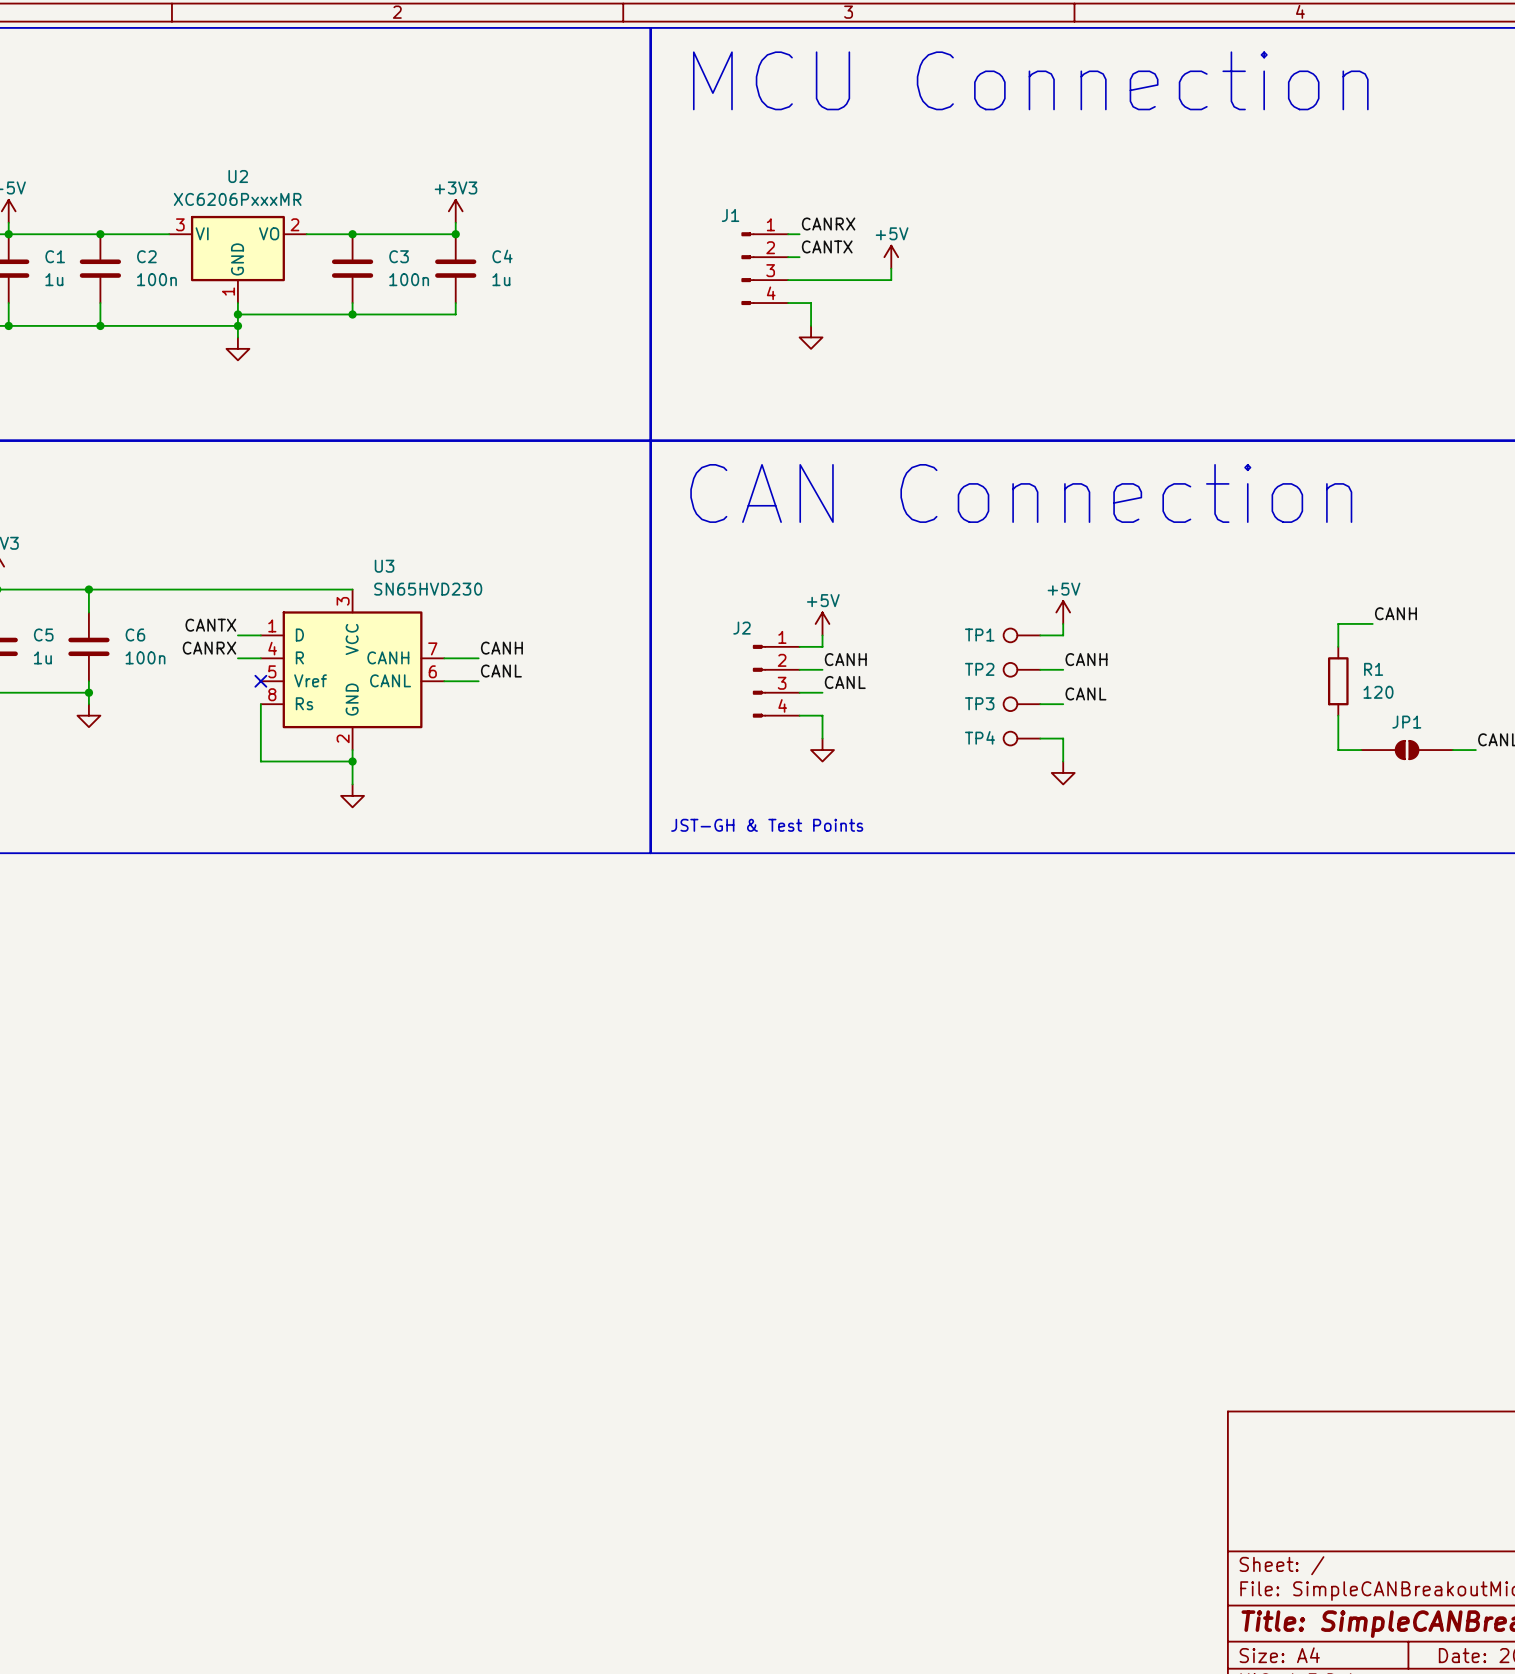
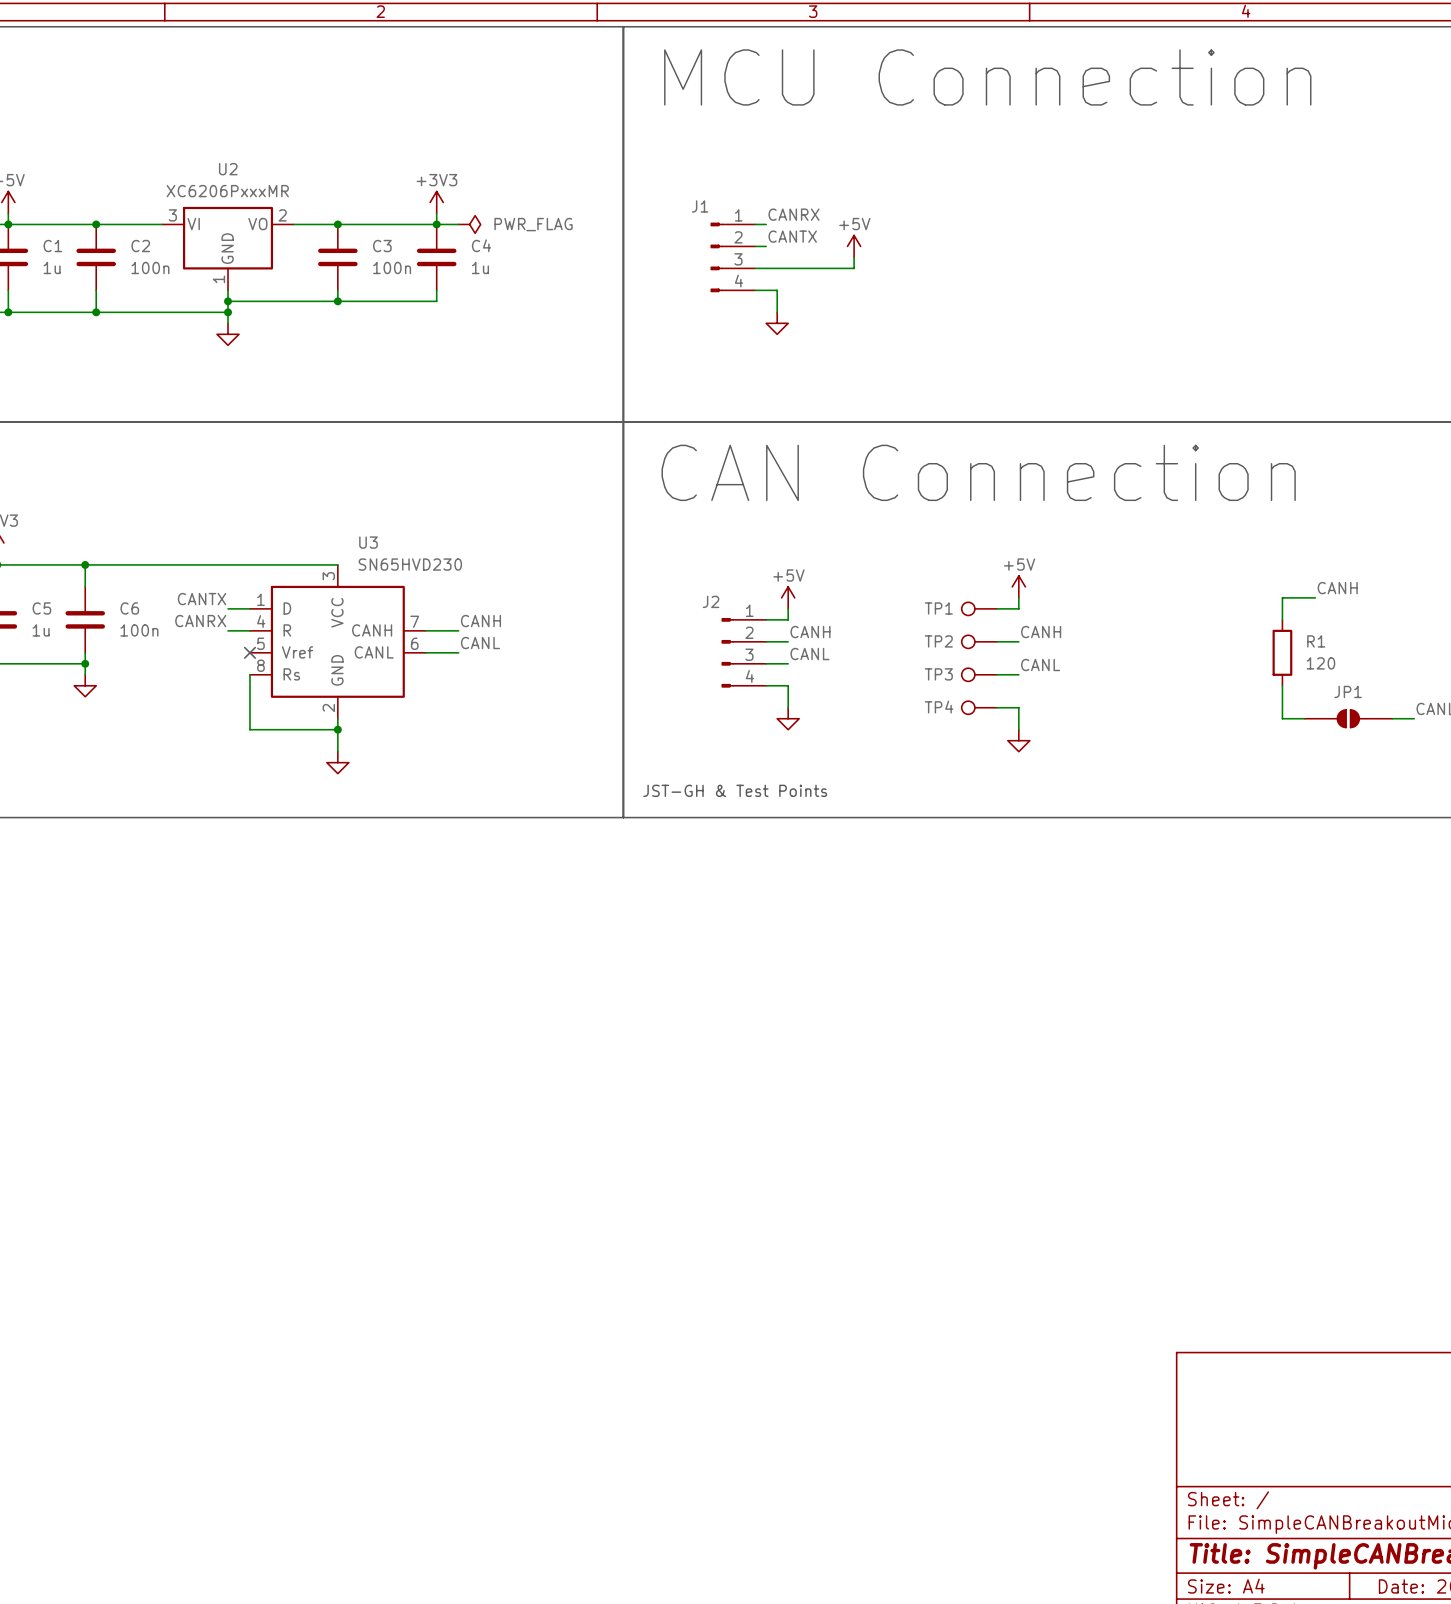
wire: none -> (436, 224) (458, 224)
power symbol: none -> PWR_FLAG (469, 224)

